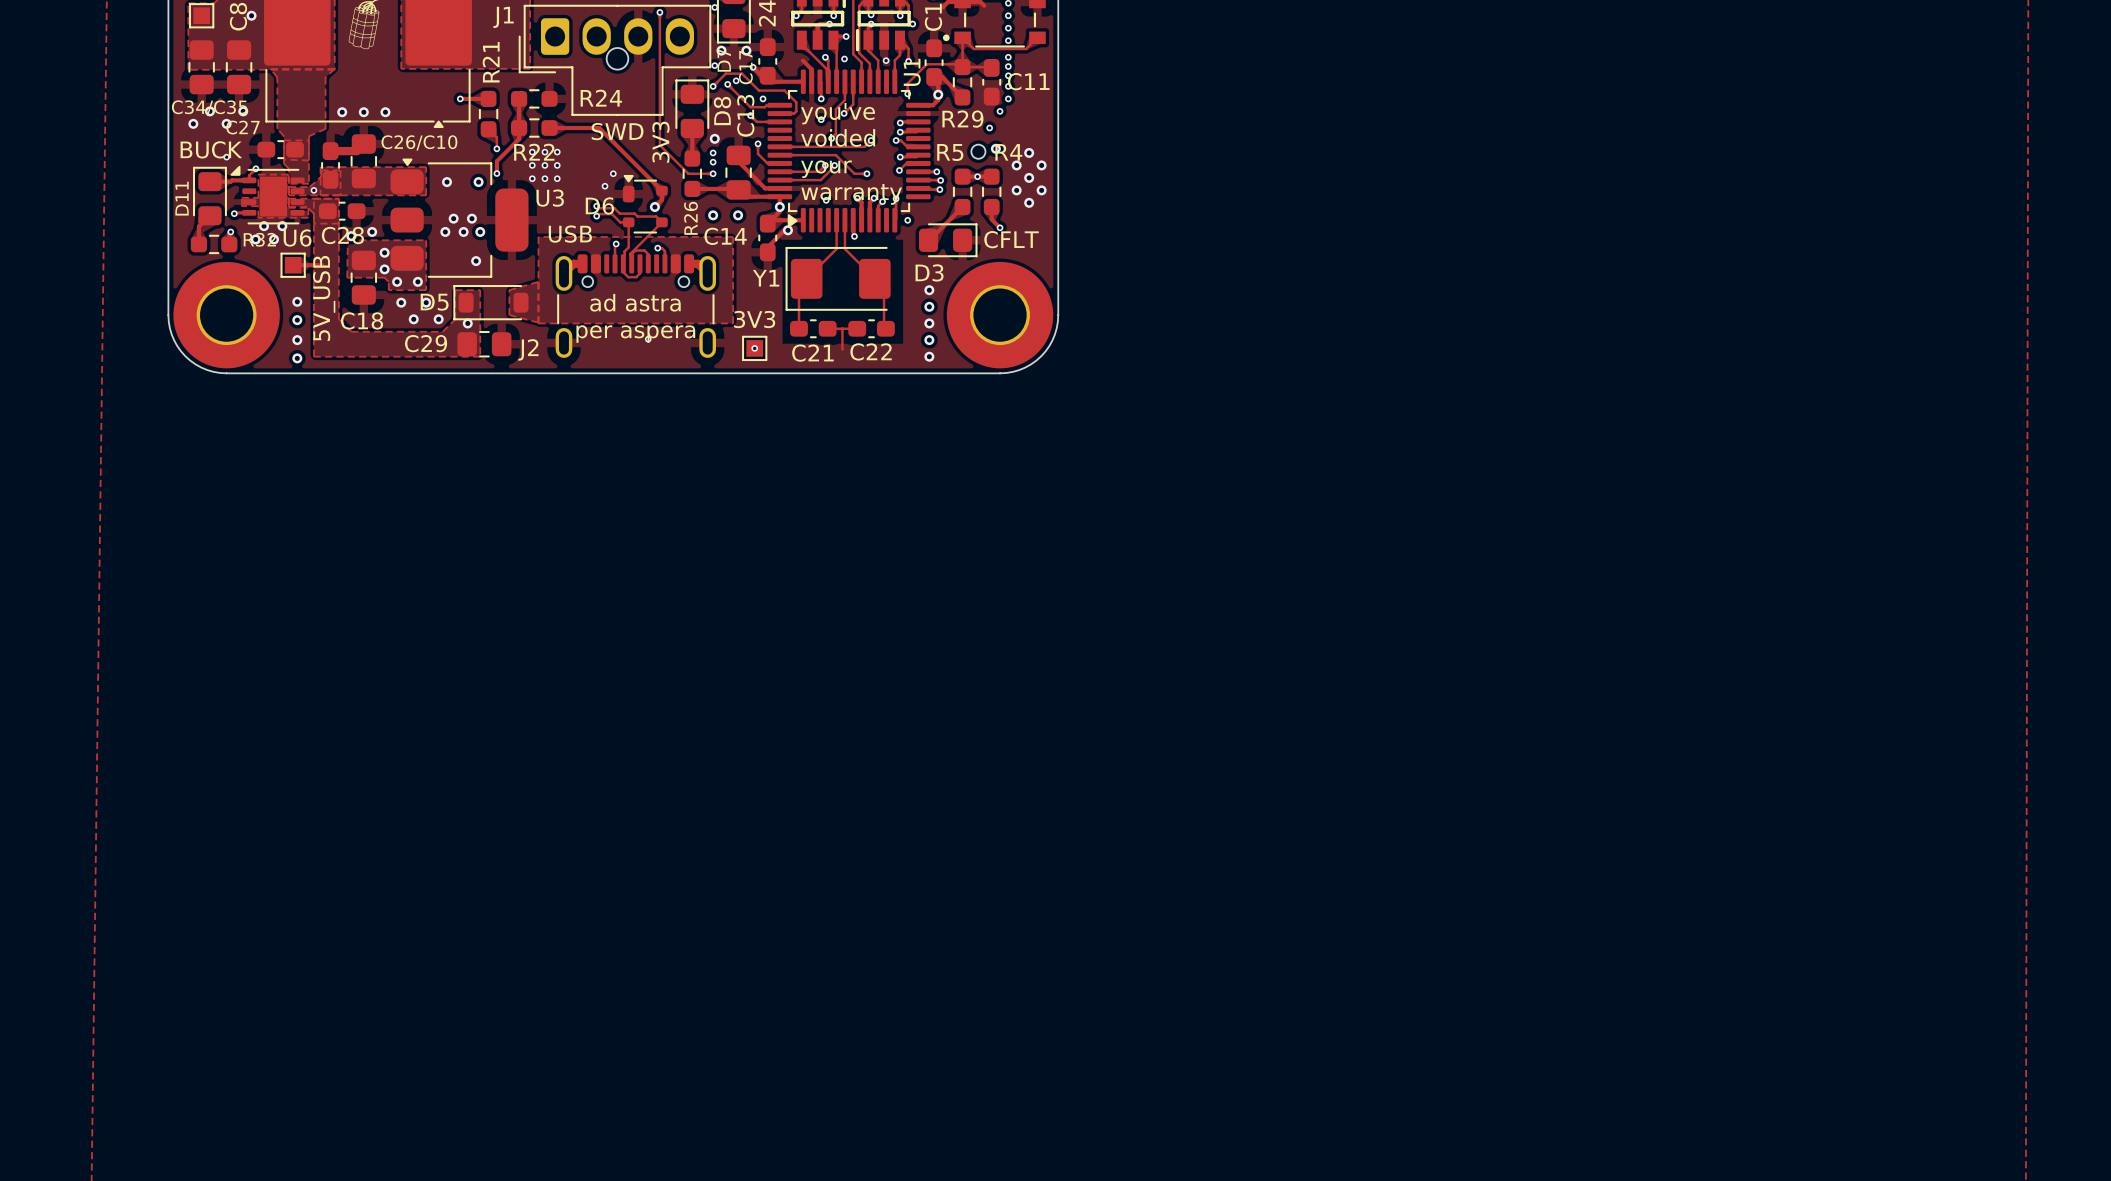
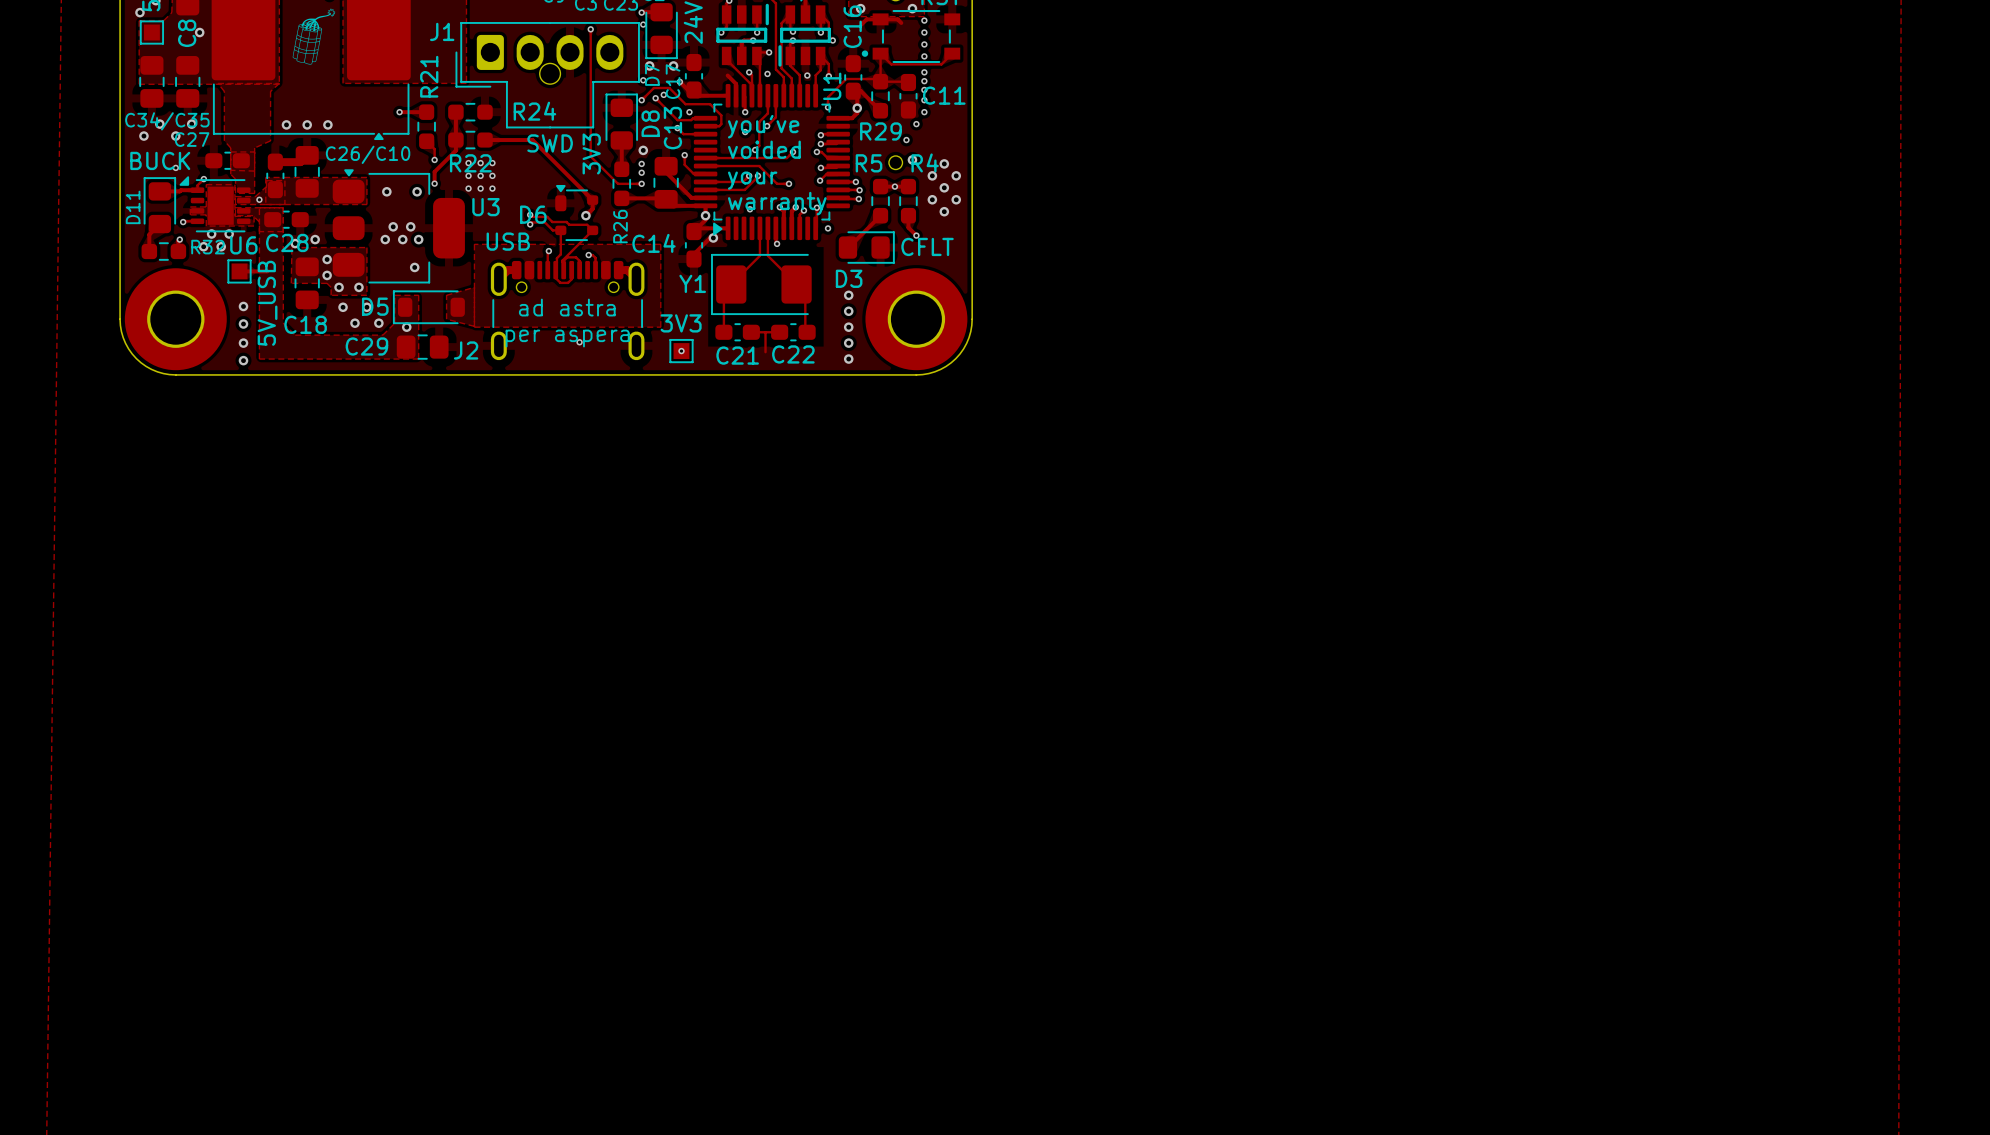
via: (613, 173) -> none
via: (605, 186) -> none
via: (713, 215) -> none
via: (738, 215) -> none

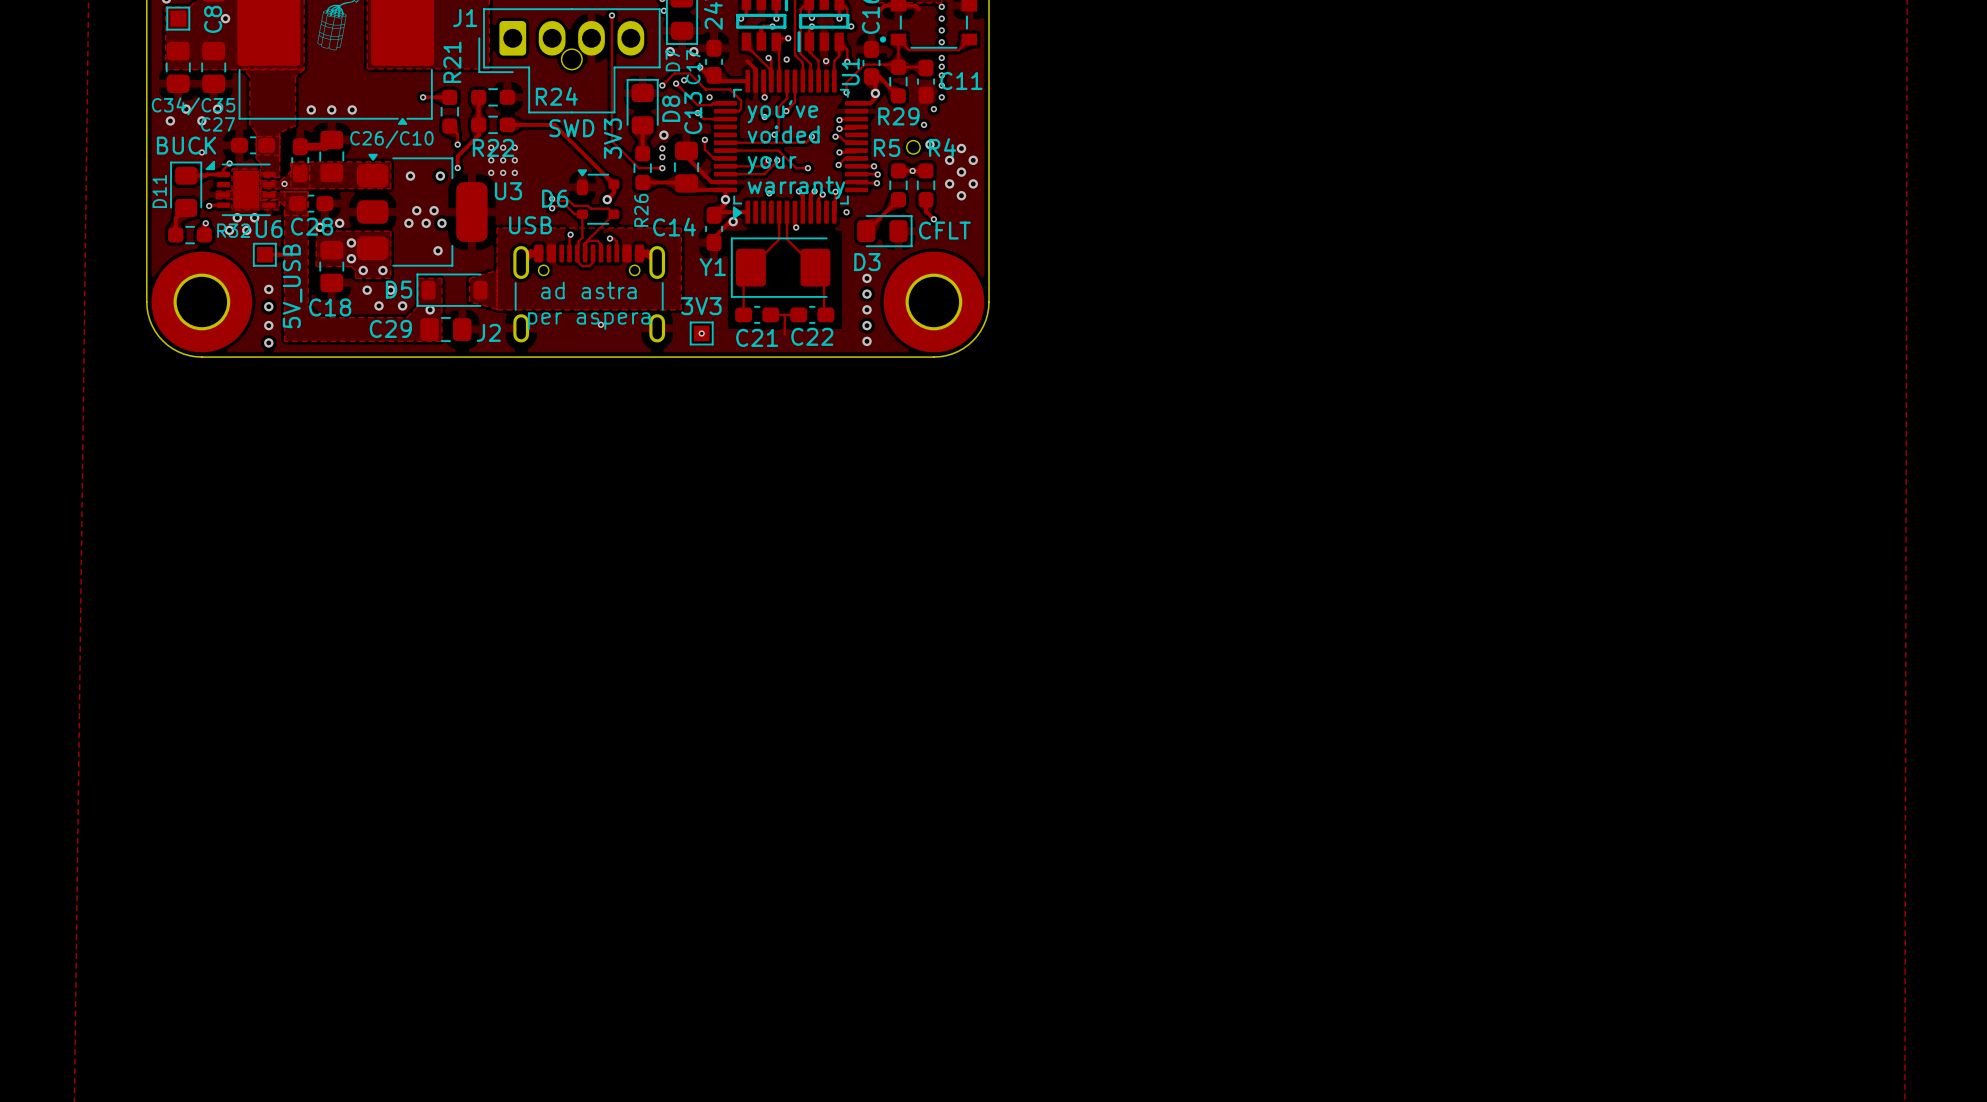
via: (643, 80) -> none

